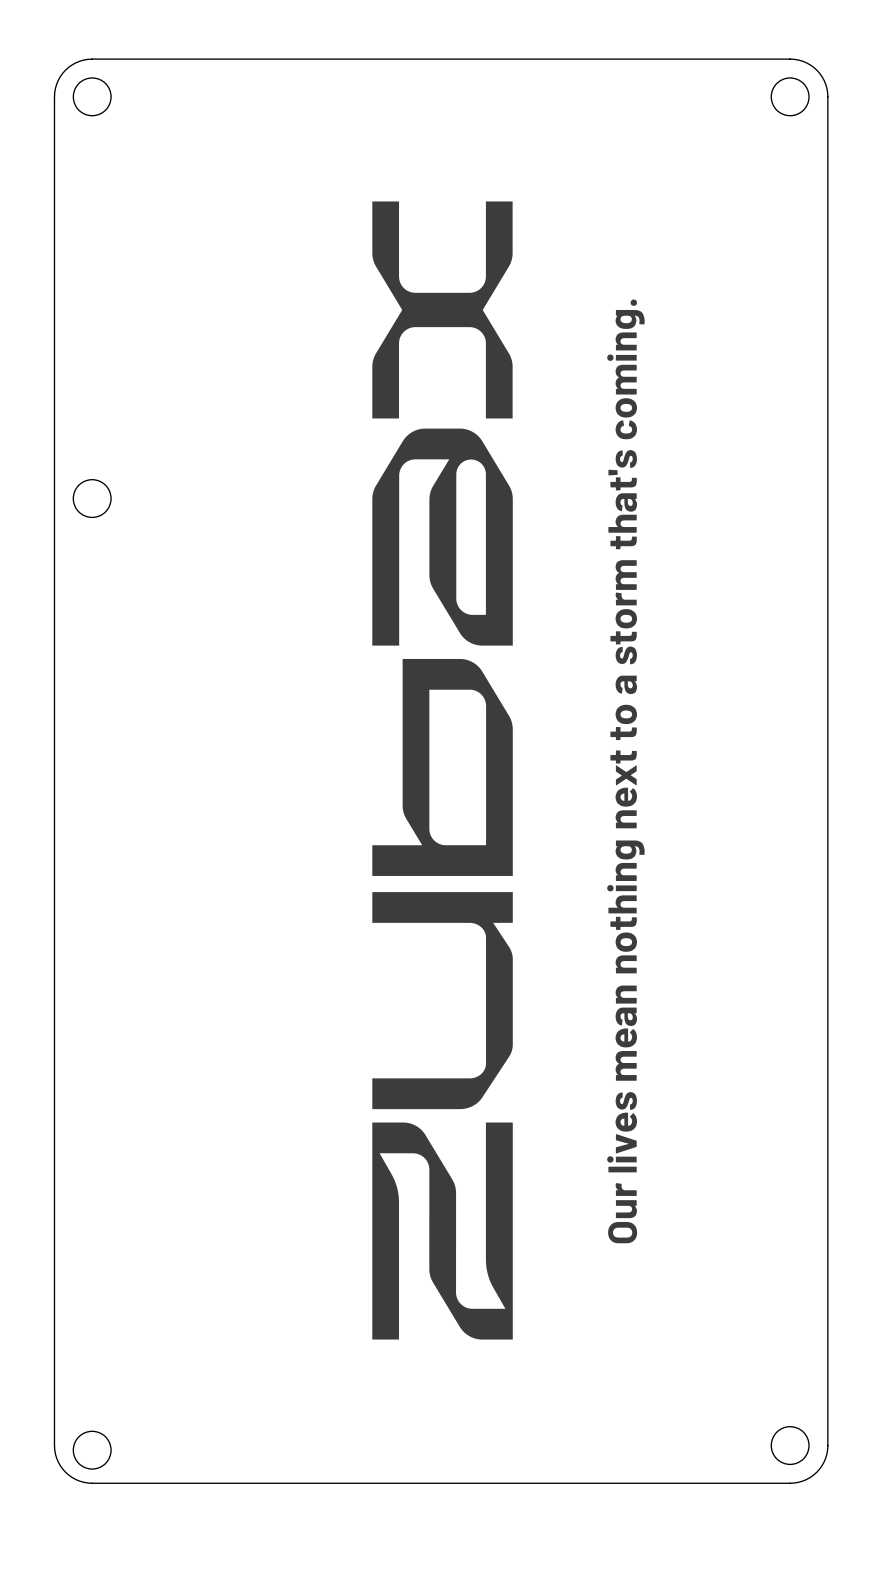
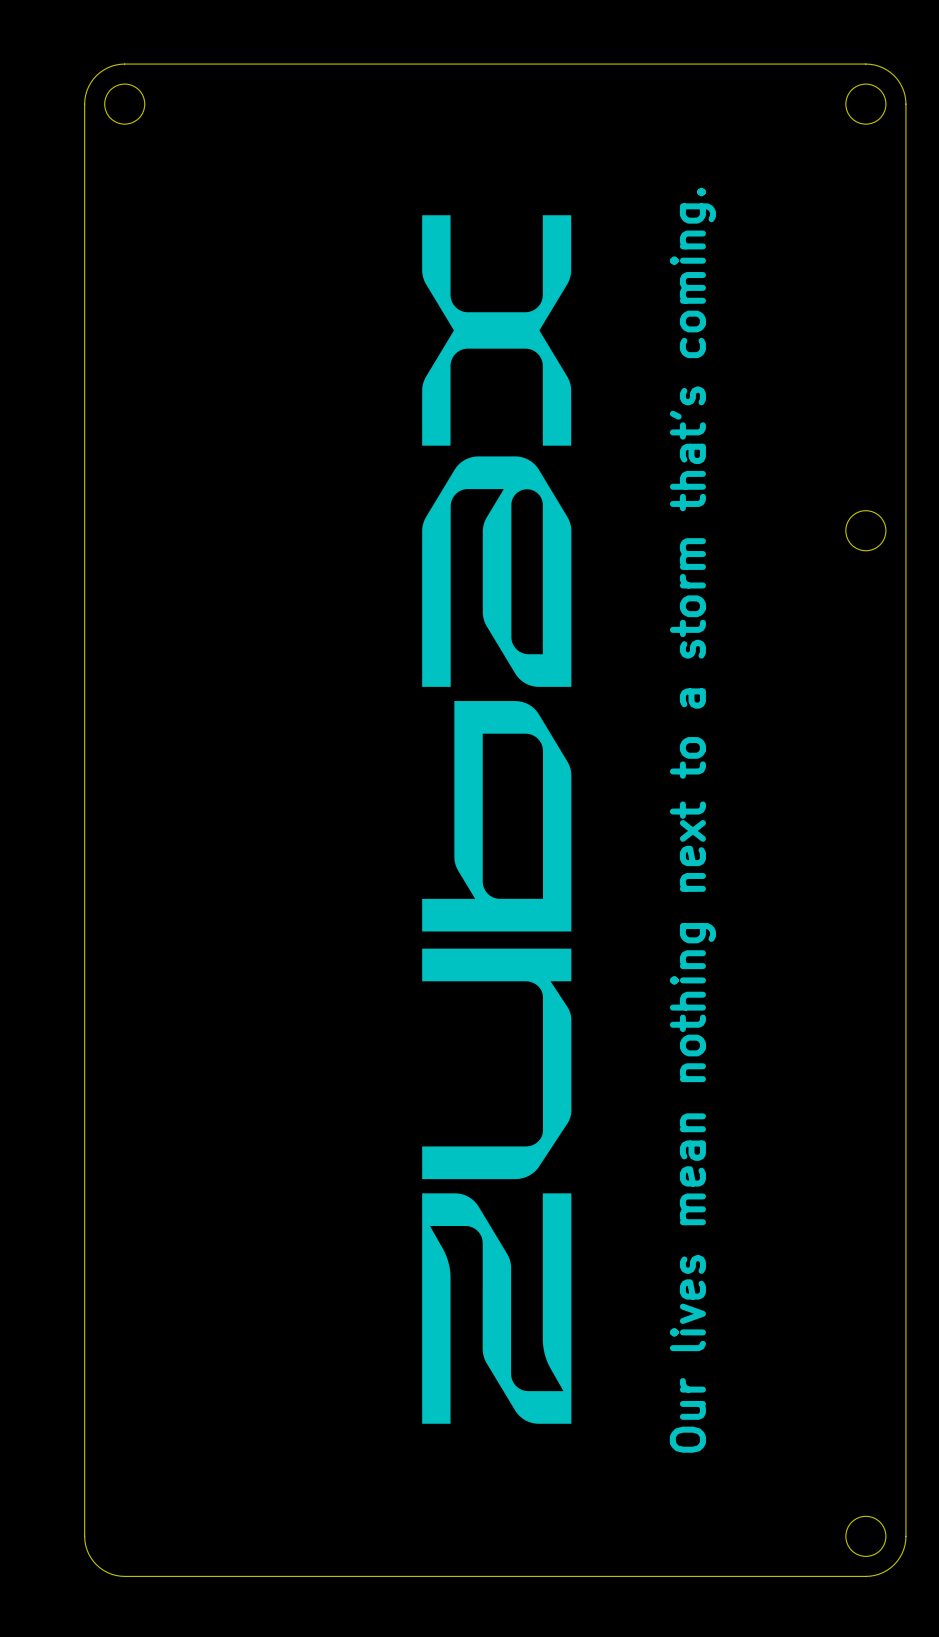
round board edge: [72, 479, 112, 518] -> none
round board edge: none -> [845, 510, 887, 552]
round board edge: [72, 1430, 112, 1470] -> none

